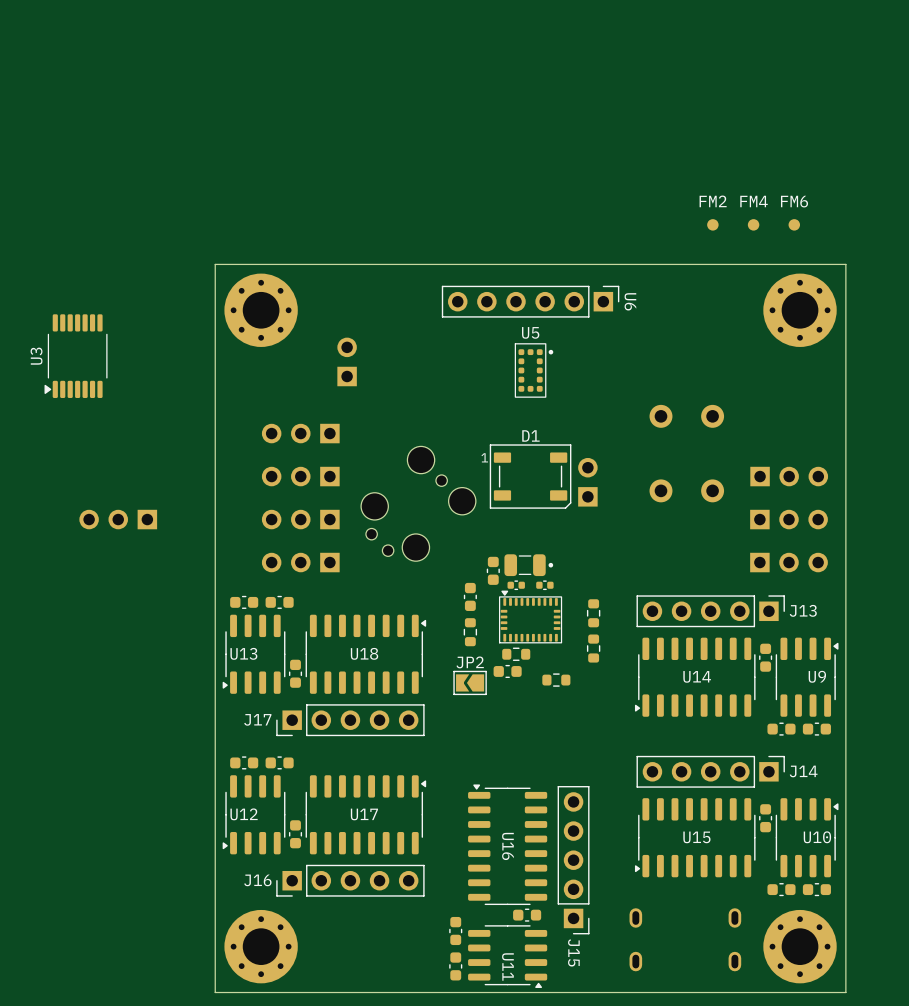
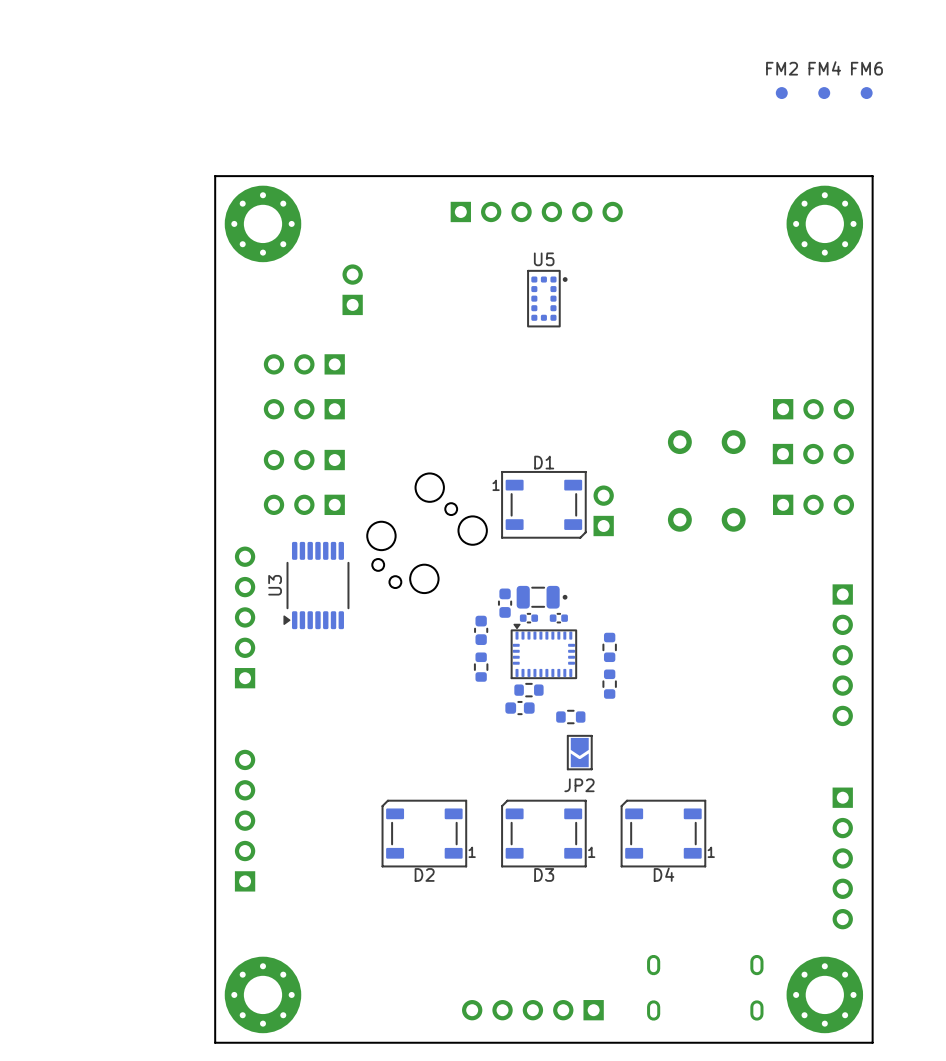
FM2 position: (712, 224) -> (781, 93)
FM4 position: (753, 224) -> (824, 93)
FM6 position: (794, 224) -> (866, 93)
board edge: (845, 264) (215, 264) -> (872, 283) (872, 176) (215, 176) (215, 283)
U6 side: bottom (530, 301) -> top (536, 211)
part position: (261, 310) -> (262, 223)
part position: (800, 310) -> (824, 223)
part: none -> (304, 364)
U3 position: (75, 356) -> (316, 585)
part position: (347, 361) -> (352, 289)
U5 position: (534, 370) -> (547, 298)
part: none -> (304, 409)
part: none -> (813, 409)
part: none -> (813, 454)
part: (118, 519) -> none
part: (300, 519) -> none
part: (789, 519) -> none
part: (300, 562) -> none
part: (789, 562) -> none
part: (244, 602) -> none
part: (279, 602) -> none
J13 side: bottom (710, 611) -> top (842, 655)
U13: (254, 654) -> none
U18: (365, 654) -> none
part: (765, 657) -> none
JP2 name position: JP2 (470, 662) -> JP2 (579, 785)
part: (295, 673) -> none
U14: (695, 677) -> none
U9: (807, 677) -> none
JP2 rotation: 0° (470, 682) -> 90° counterclockwise (579, 752)
JP2 position: (470, 682) -> (579, 752)
J17 side: bottom (350, 720) -> top (245, 617)
part: (781, 729) -> none
part: (816, 729) -> none
part: (244, 762) -> none
part: (279, 762) -> none
J14 side: bottom (710, 771) -> top (842, 858)
D2: none -> (424, 833)
D3: none -> (543, 833)
D4: none -> (663, 833)
U12: (254, 814) -> none
U17: (365, 814) -> none
part: (765, 818) -> none
part: (295, 834) -> none
U15: (695, 837) -> none
U10: (807, 837) -> none
U16: (507, 844) -> none
J15 side: bottom (573, 860) -> top (532, 1010)
J16 side: bottom (350, 880) -> top (245, 820)
part: (781, 889) -> none
part: (816, 889) -> none
part: (527, 915) -> none
part: (455, 931) -> none
U11: (507, 956) -> none
part: (455, 966) -> none

